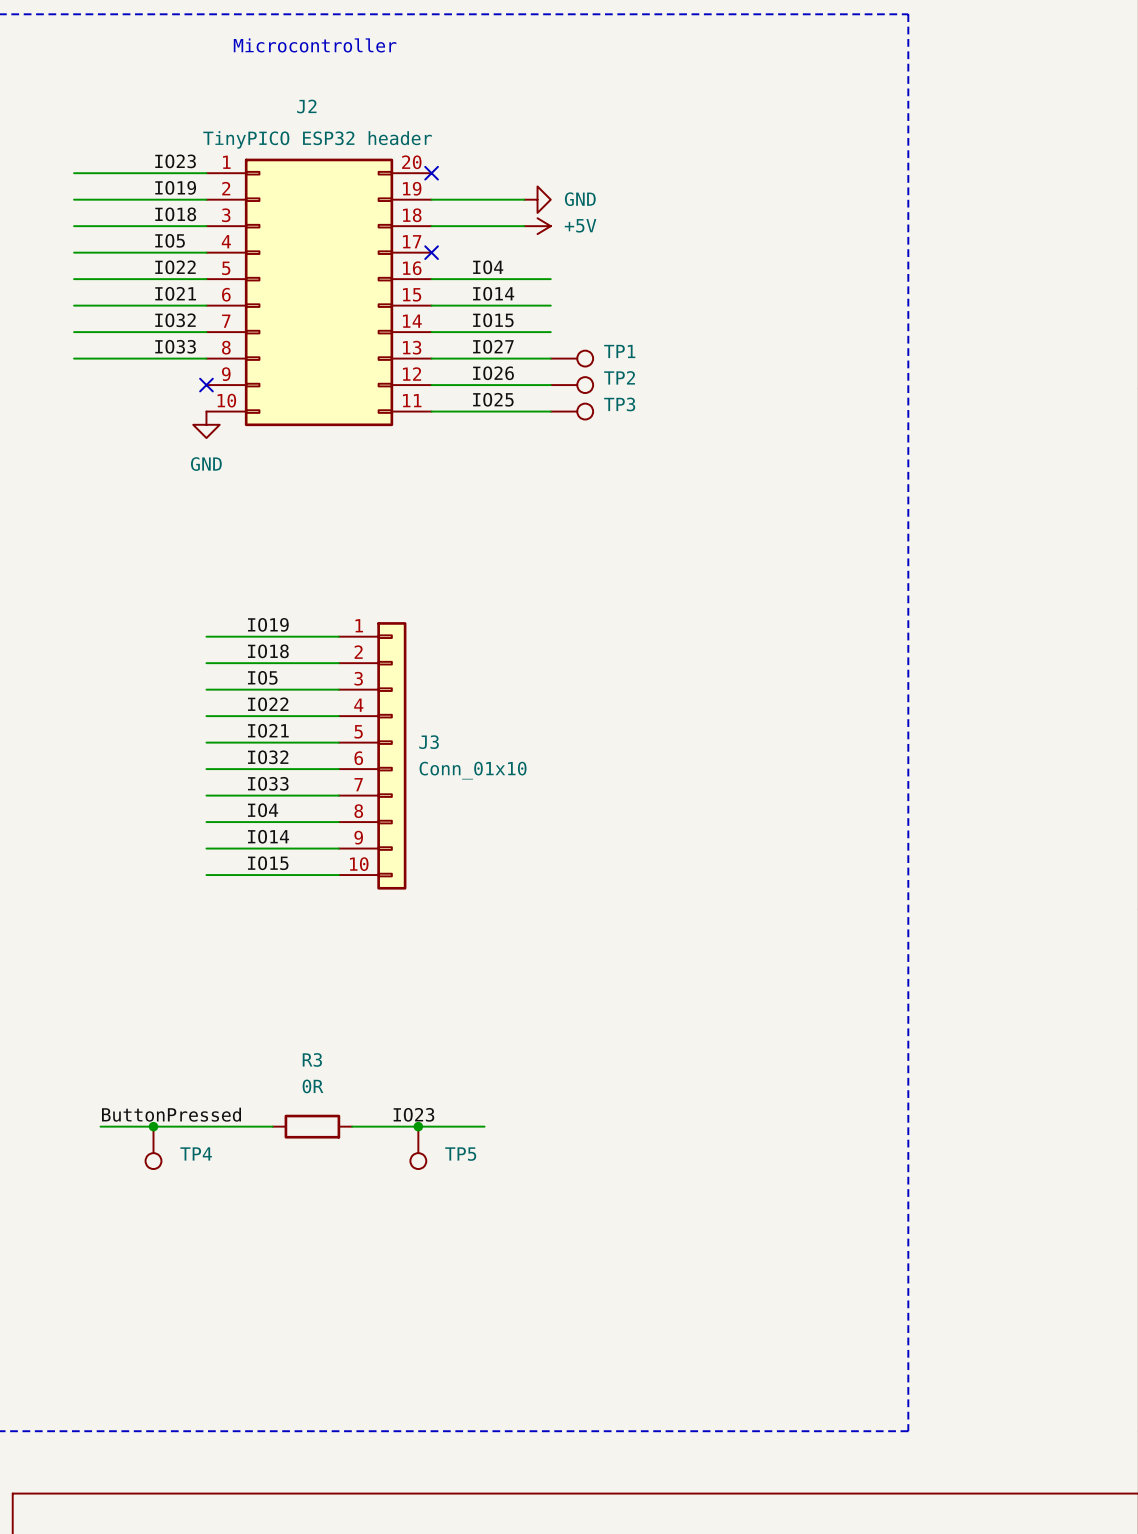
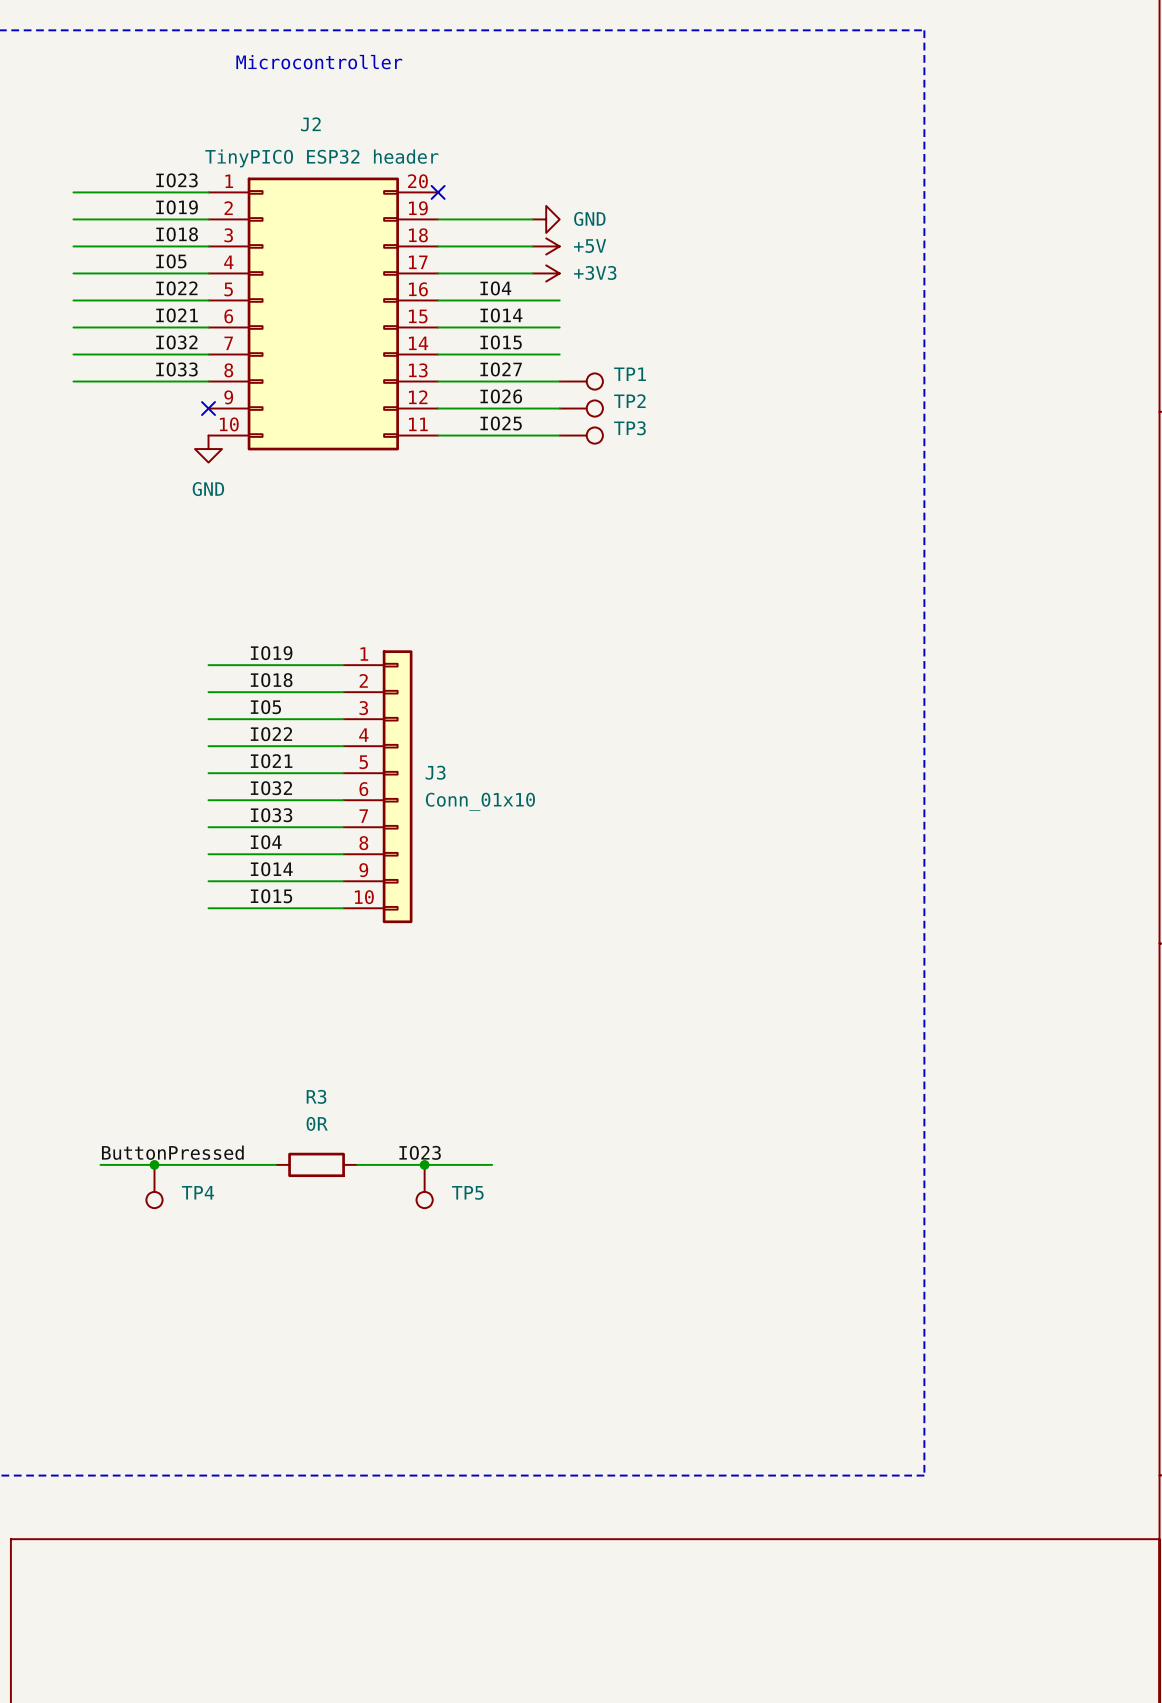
wire: none -> (438, 273) (532, 273)
no-connect mark: (431, 252) -> none
power symbol: none -> +3V3 (546, 273)

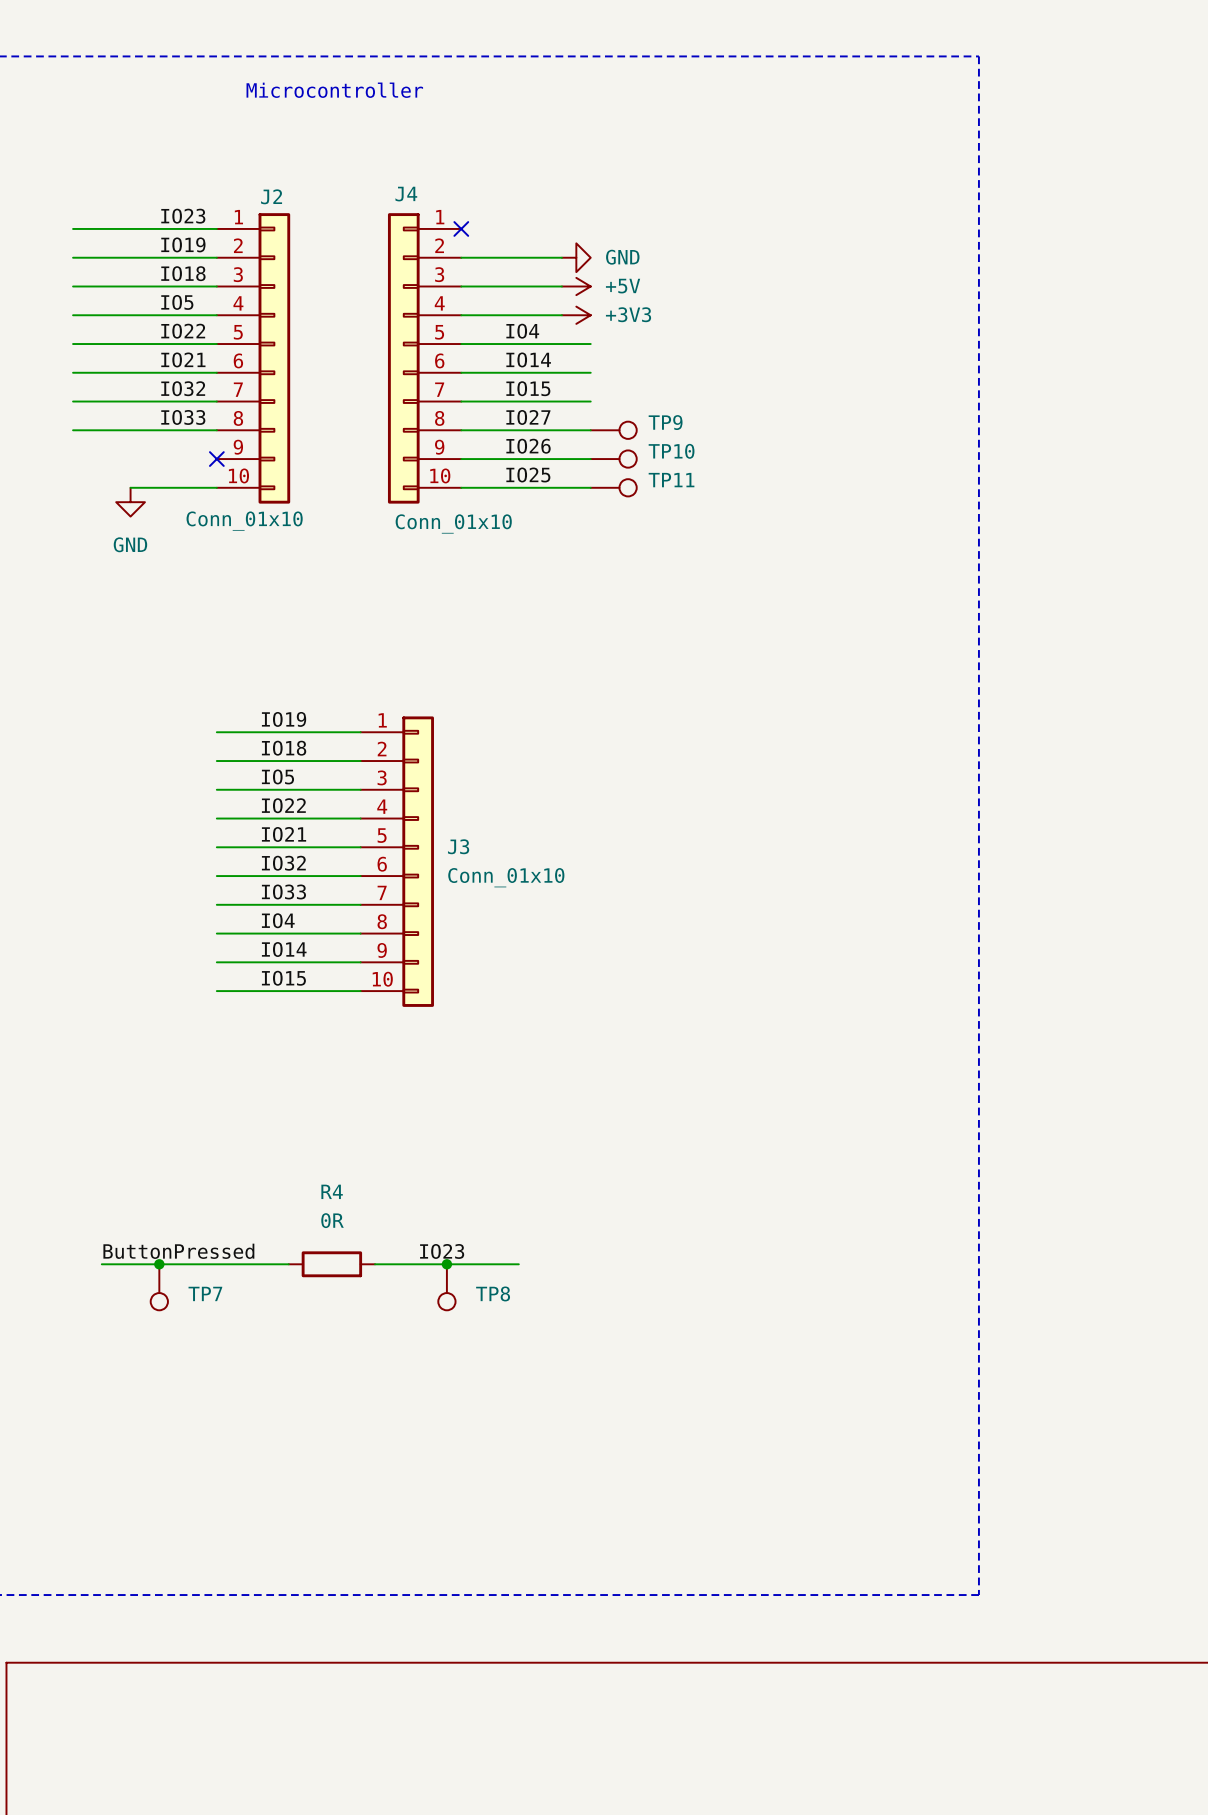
J2 name position: J2 (310, 124) -> J2 (271, 196)
J2 value: TinyPICO ESP32 header (321, 158) -> Conn_01x10 (244, 521)
J2 symbol: [208, 177, 439, 451] -> [216, 213, 291, 504]
J4: none -> Conn_01x10 (424, 358)
TP1 name: TP1 (630, 374) -> TP9 (665, 422)
TP2 name: TP2 (629, 401) -> TP10 (671, 451)
TP3 name: TP3 (629, 428) -> TP11 (671, 480)
wire: none -> (130, 487) (216, 487)
power symbol position: GND (208, 449) -> GND (130, 502)
R3 name: R3 (316, 1096) -> R4 (332, 1191)
TP4 name: TP4 (198, 1192) -> TP7 (205, 1293)
TP5 name: TP5 (467, 1192) -> TP8 (493, 1293)

